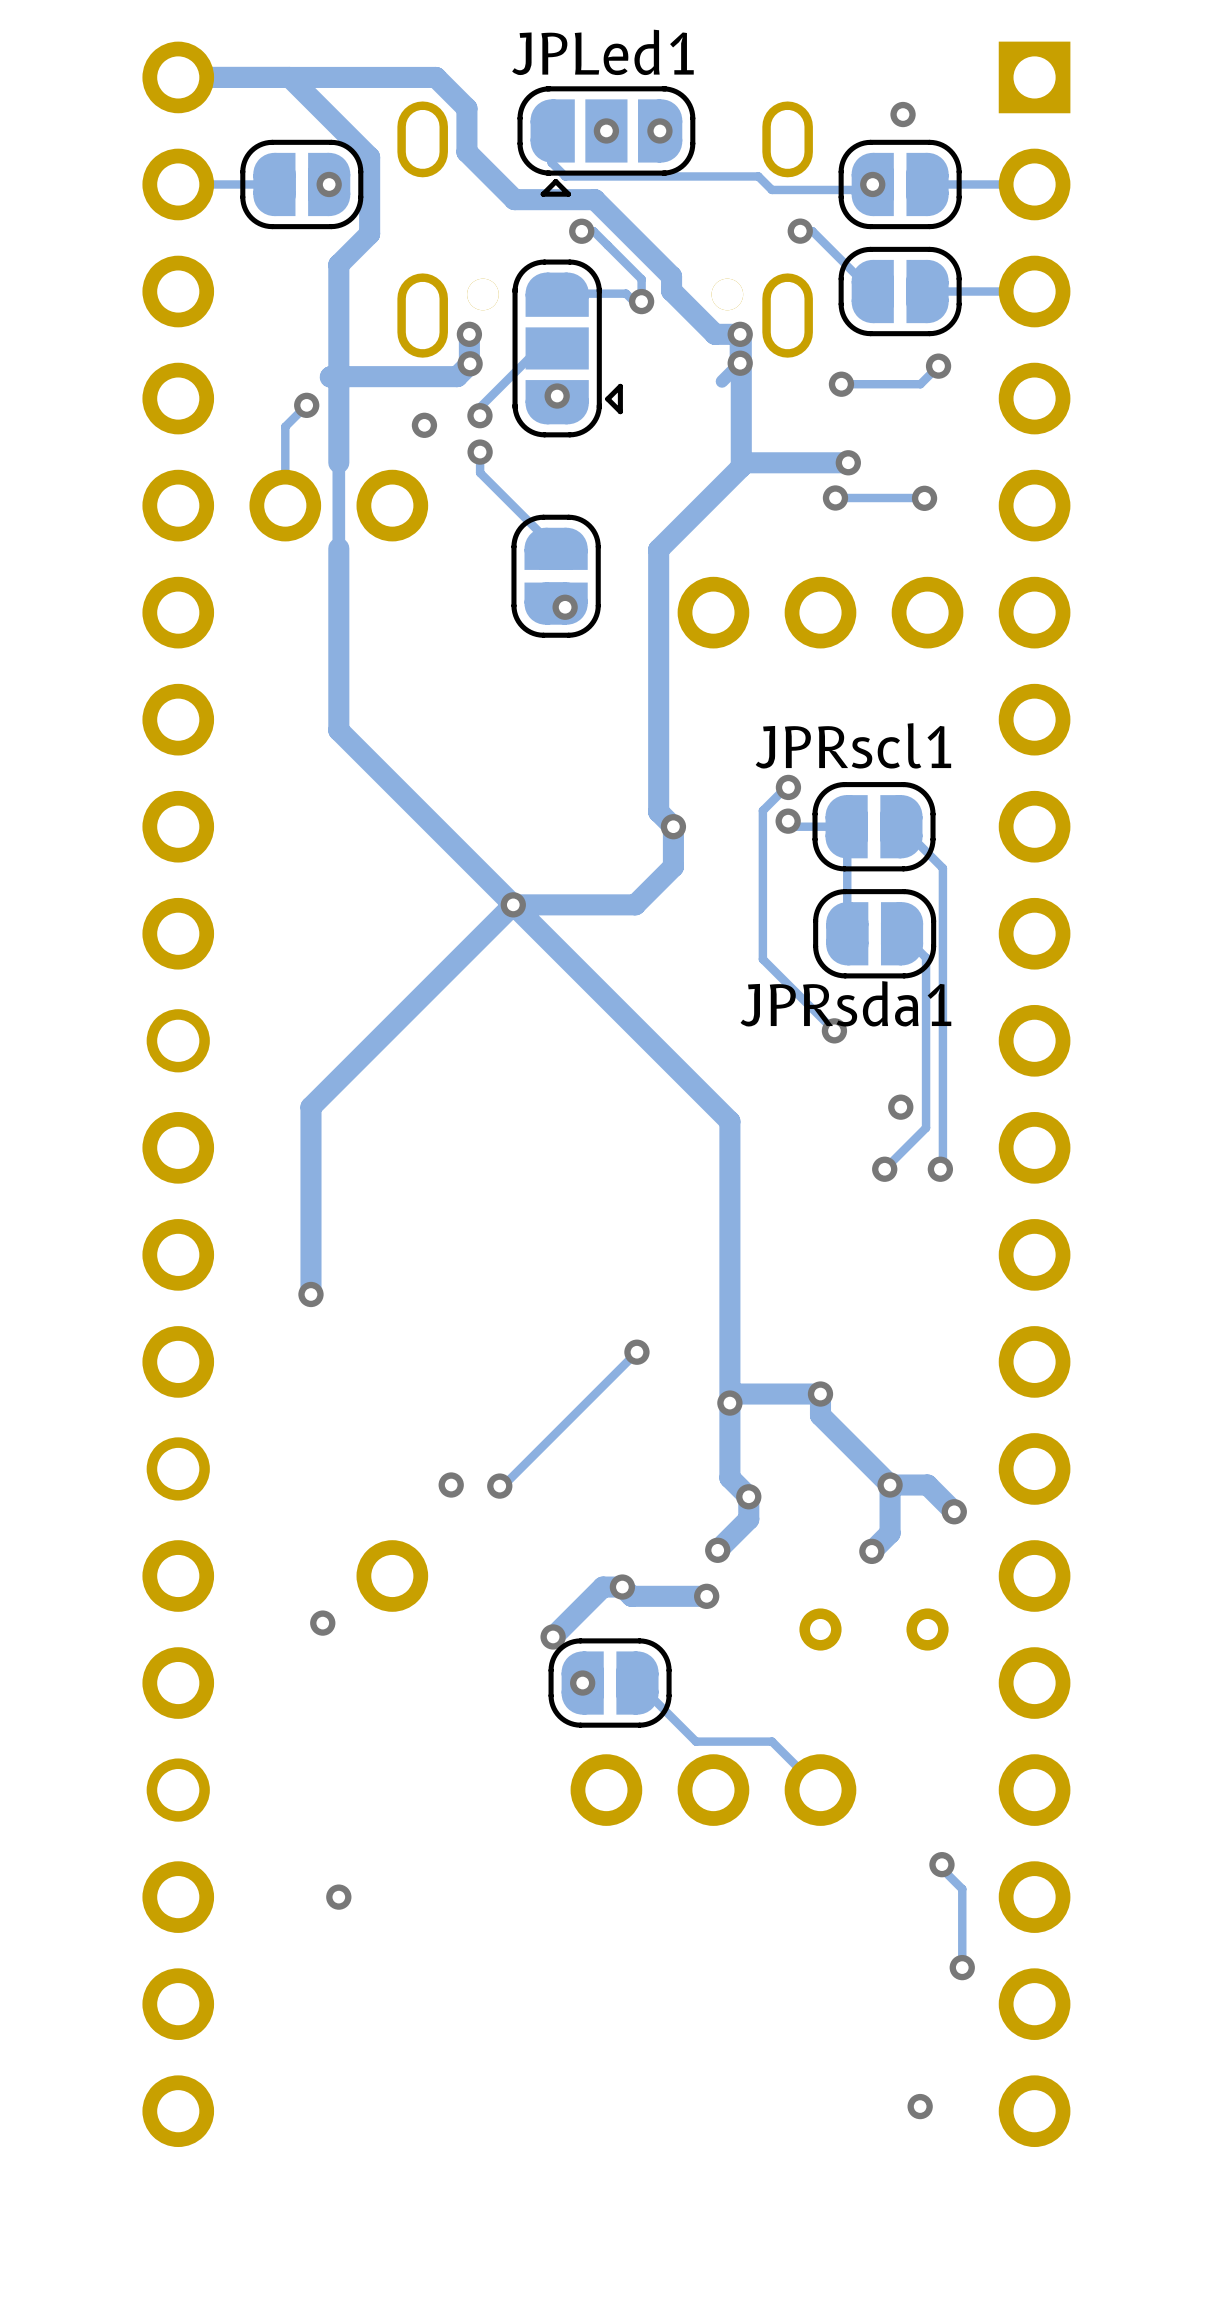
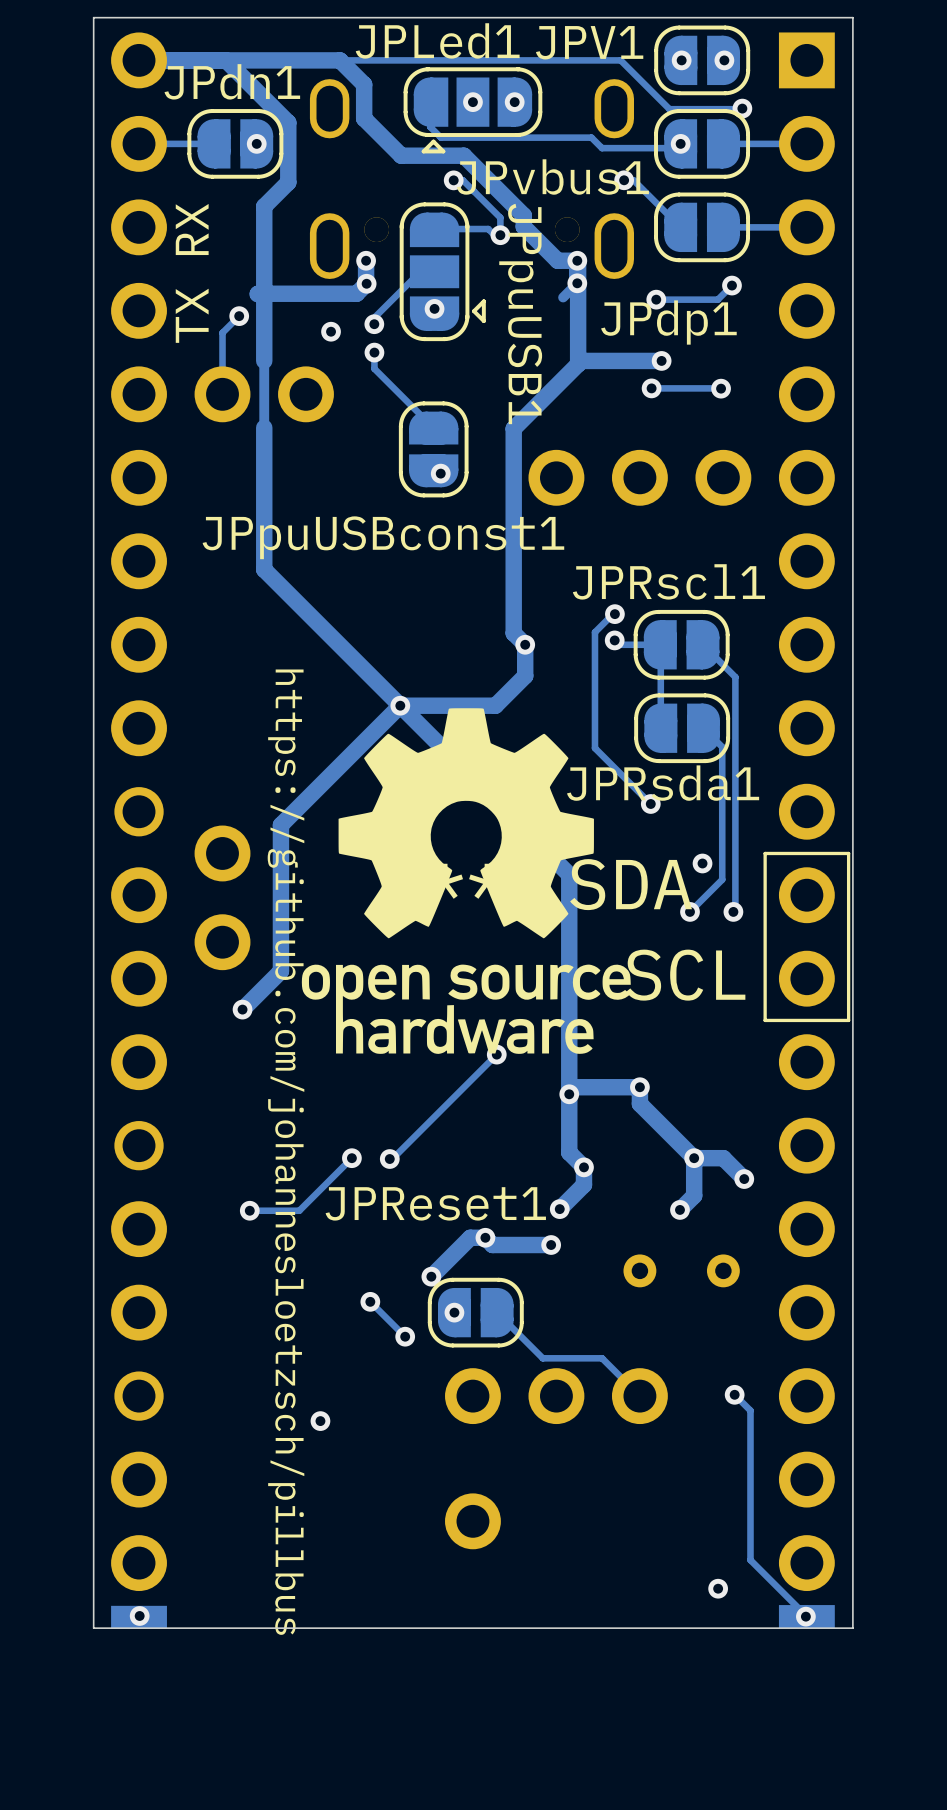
board edge: none -> (852, 17) (93, 17) (93, 1628) (852, 1628) (852, 17)
JPLed1 name position: JPLed1 (602, 52) -> JPLed1 (437, 40)
track: none -> (340, 60) (620, 60) (669, 109) (742, 108)
via: none -> (681, 60)
JPV1: none -> (702, 60)
via: none -> (724, 60)
JPdn1 name: none -> JPdn1 (232, 81)
via: (903, 114) -> none
via: none -> (742, 108)
JPvbus1 name: none -> JPvbus1 (552, 177)
text: none -> TX RX (192, 273)
JPpuUSB1 name: none -> JPpuUSB1 (520, 313)
JPdp1 name: none -> JPdp1 (668, 322)
JPpuUSBconst1 name: none -> JPpuUSBconst1 (383, 537)
track: (360, 1057) (310, 1107) (310, 1294) -> (280, 825) (280, 971) (242, 1009)
part: none -> (222, 853)
line: none -> (848, 853) (765, 853) (765, 1020) (848, 1020) (848, 853)
part footprint: [142, 1112, 215, 2148] -> [111, 867, 167, 1629]
part footprint: [998, 1112, 1071, 2148] -> [778, 867, 835, 1629]
part: none -> (466, 881)
text: none -> SDA (631, 884)
part: none -> (222, 942)
text: none -> SCL (685, 975)
text: none -> https://github.com/johannesloetzsch/pillbus (286, 1152)
track: none -> (351, 1158) (299, 1210) (249, 1210)
JPReset1 name: none -> JPReset1 (435, 1203)
part: (392, 1575) -> none
via position: (322, 1623) -> (249, 1210)
track: none -> (370, 1301) (405, 1336)
via: none -> (370, 1301)
via: none -> (405, 1336)
track: (941, 1864) (941, 1868) (962, 1889) -> (734, 1394) (750, 1410) (750, 1473)
via position: (941, 1864) -> (734, 1394)
via position: (338, 1897) -> (320, 1421)
part: none -> (472, 1521)
track: none -> (750, 1534) (750, 1560) (798, 1608) (806, 1608)
via: (962, 1967) -> none
via: none -> (718, 1588)
via: none -> (139, 1615)
via: none -> (805, 1616)
via: (920, 2106) -> none

